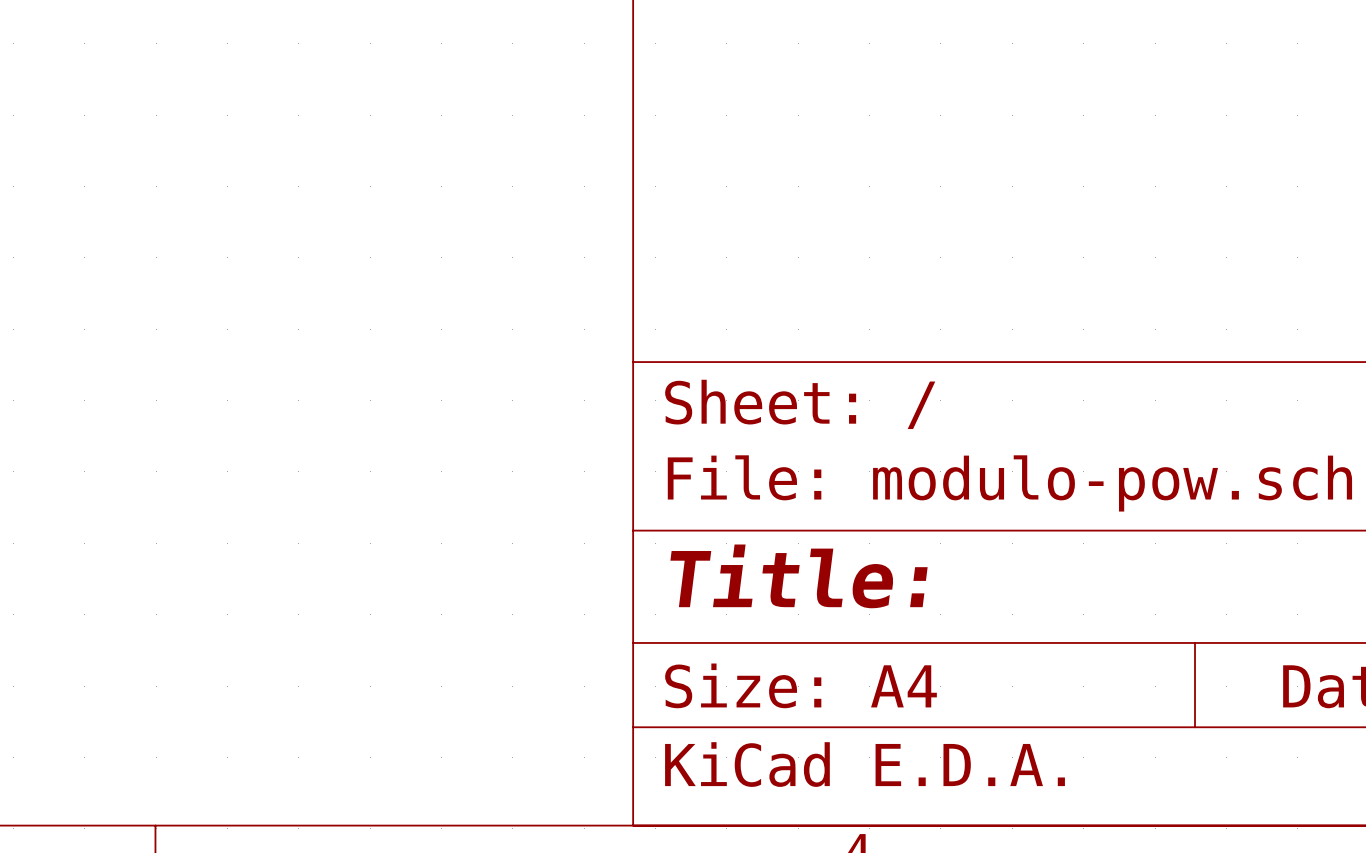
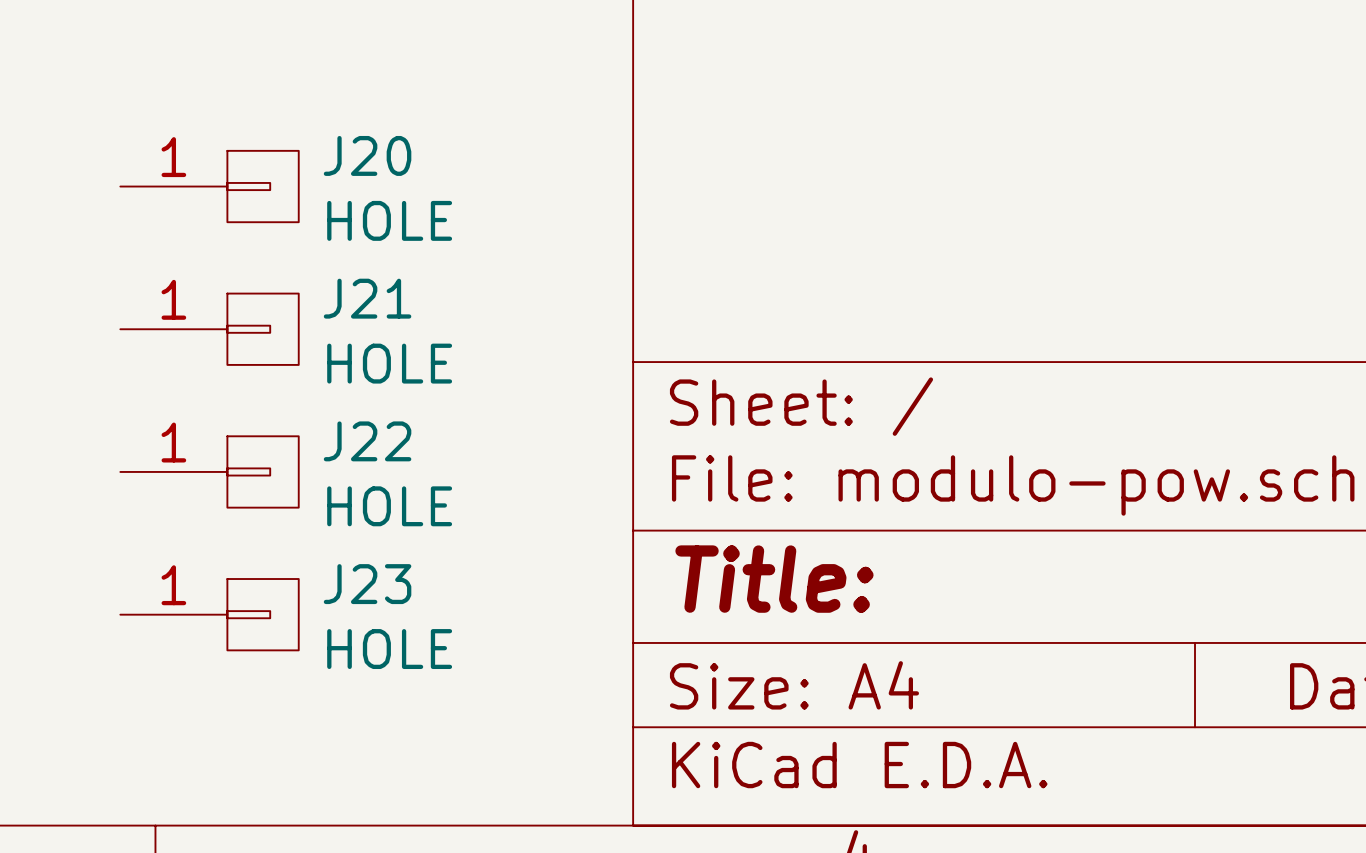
J20: none -> HOLE (209, 186)
J21: none -> HOLE (209, 329)
J22: none -> HOLE (209, 471)
J23: none -> HOLE (209, 614)

